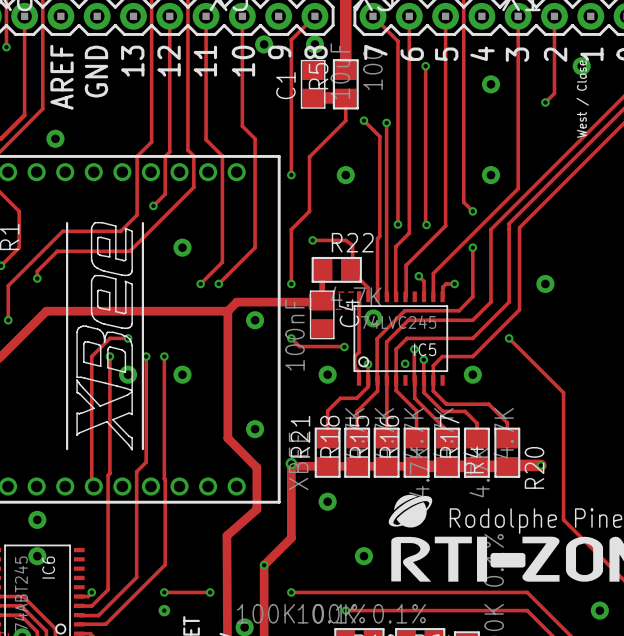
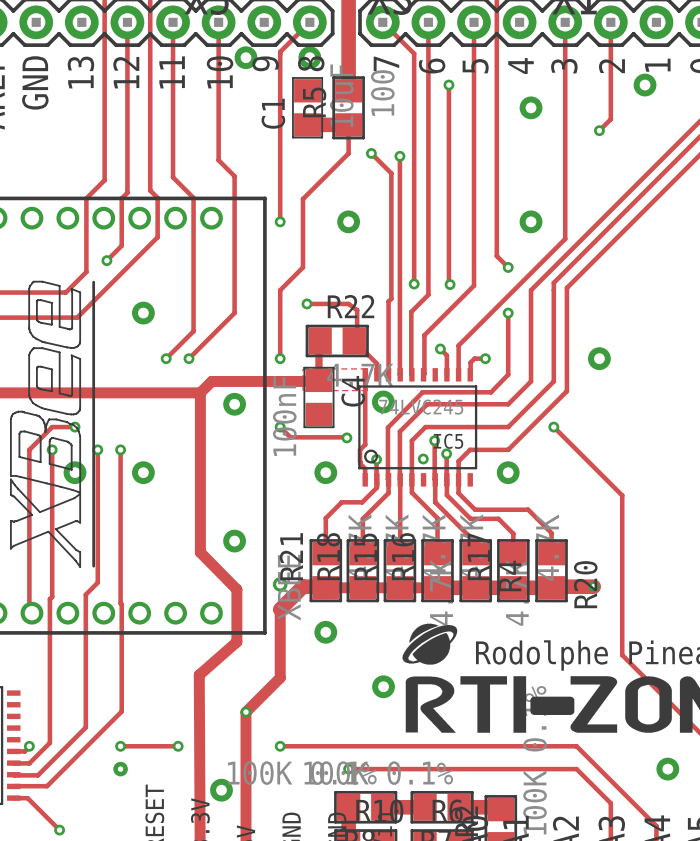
text: West / Close (582, 99) -> none
track: (327, 466) (294, 466) (291, 463) (291, 483) -> (325, 587) (303, 586) (280, 609)
via position: (363, 556) -> (383, 686)

